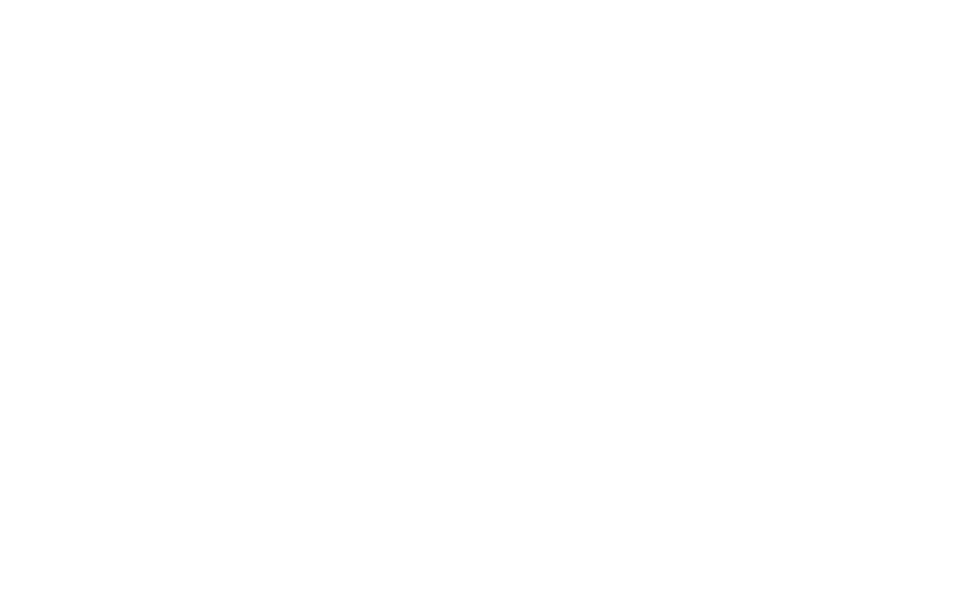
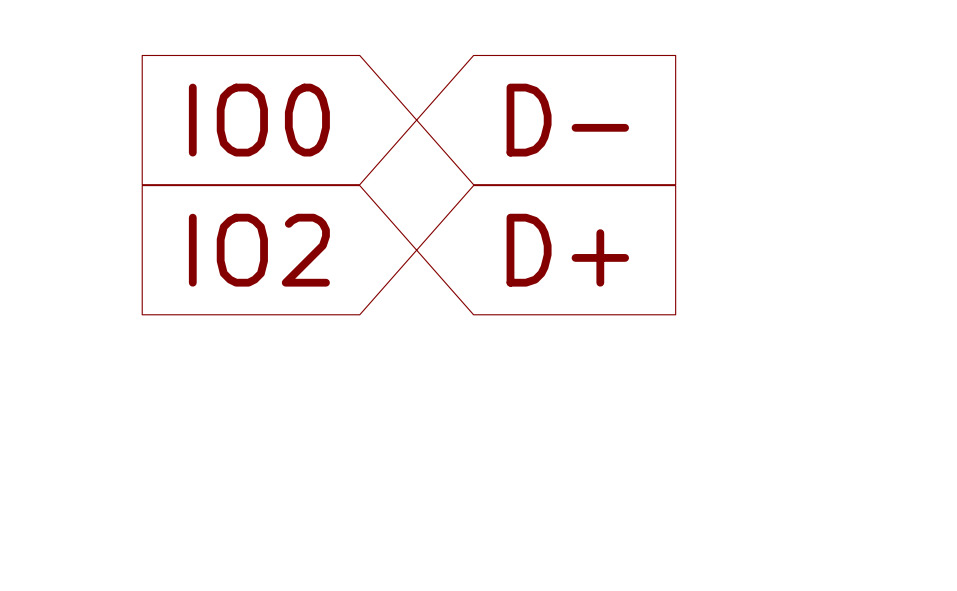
global label: none -> IO0 (259, 120)
global label: none -> D- (567, 120)
global label: none -> IO2 (259, 250)
global label: none -> D+ (567, 250)

